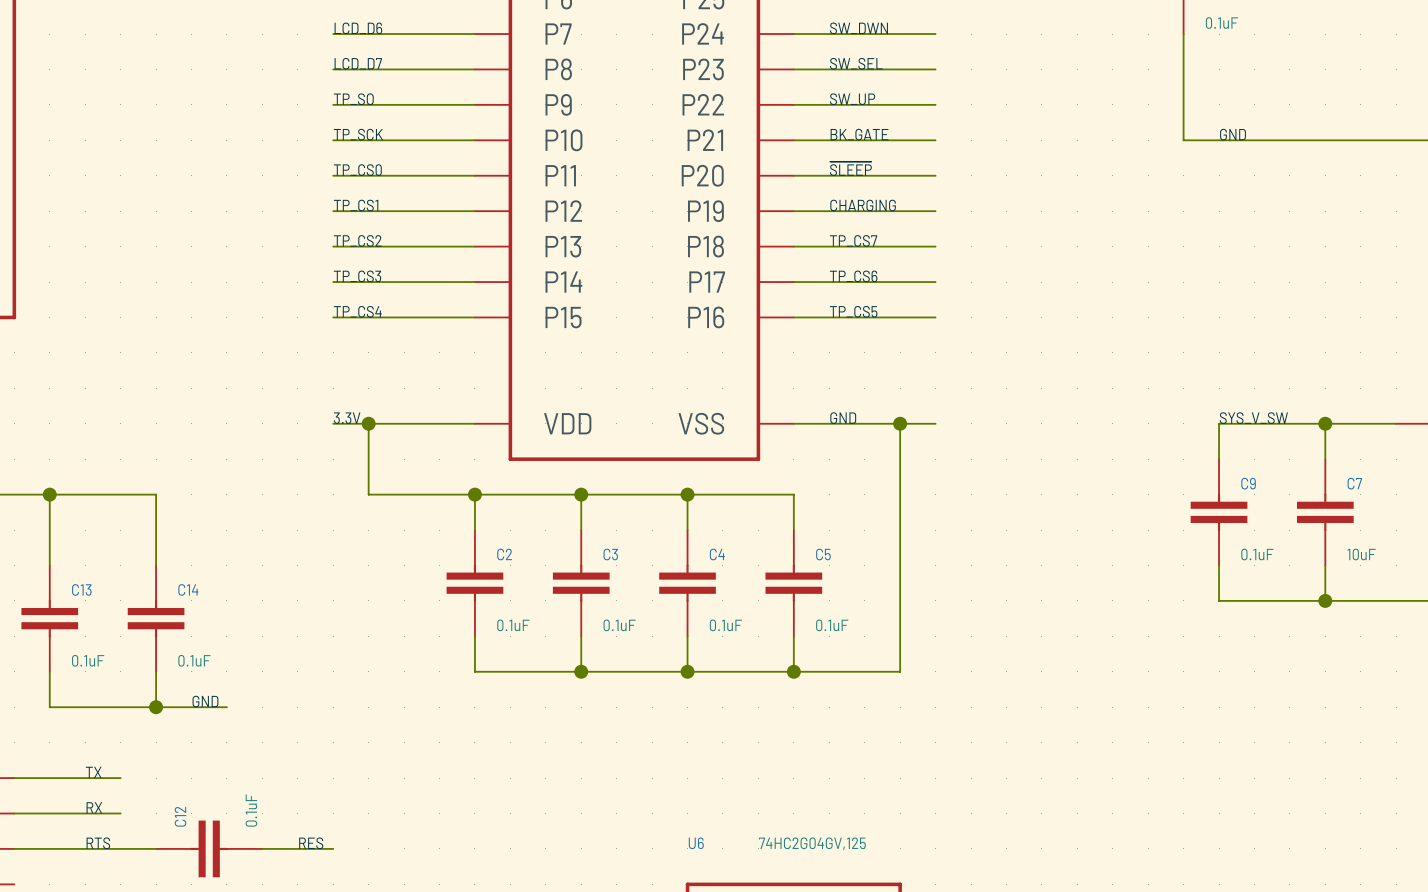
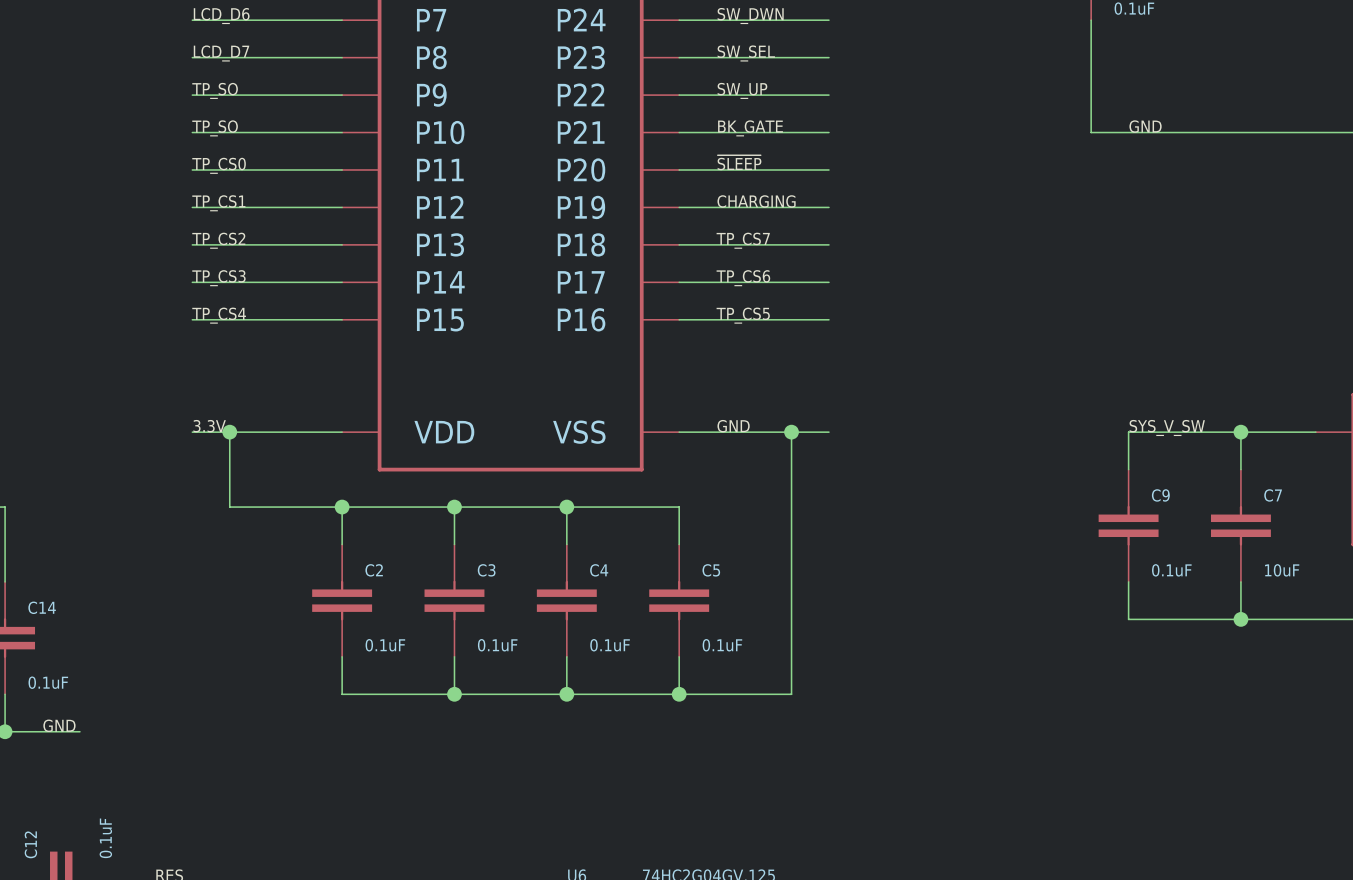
label: TP_SCK (358, 134) -> TP_SO (215, 128)

